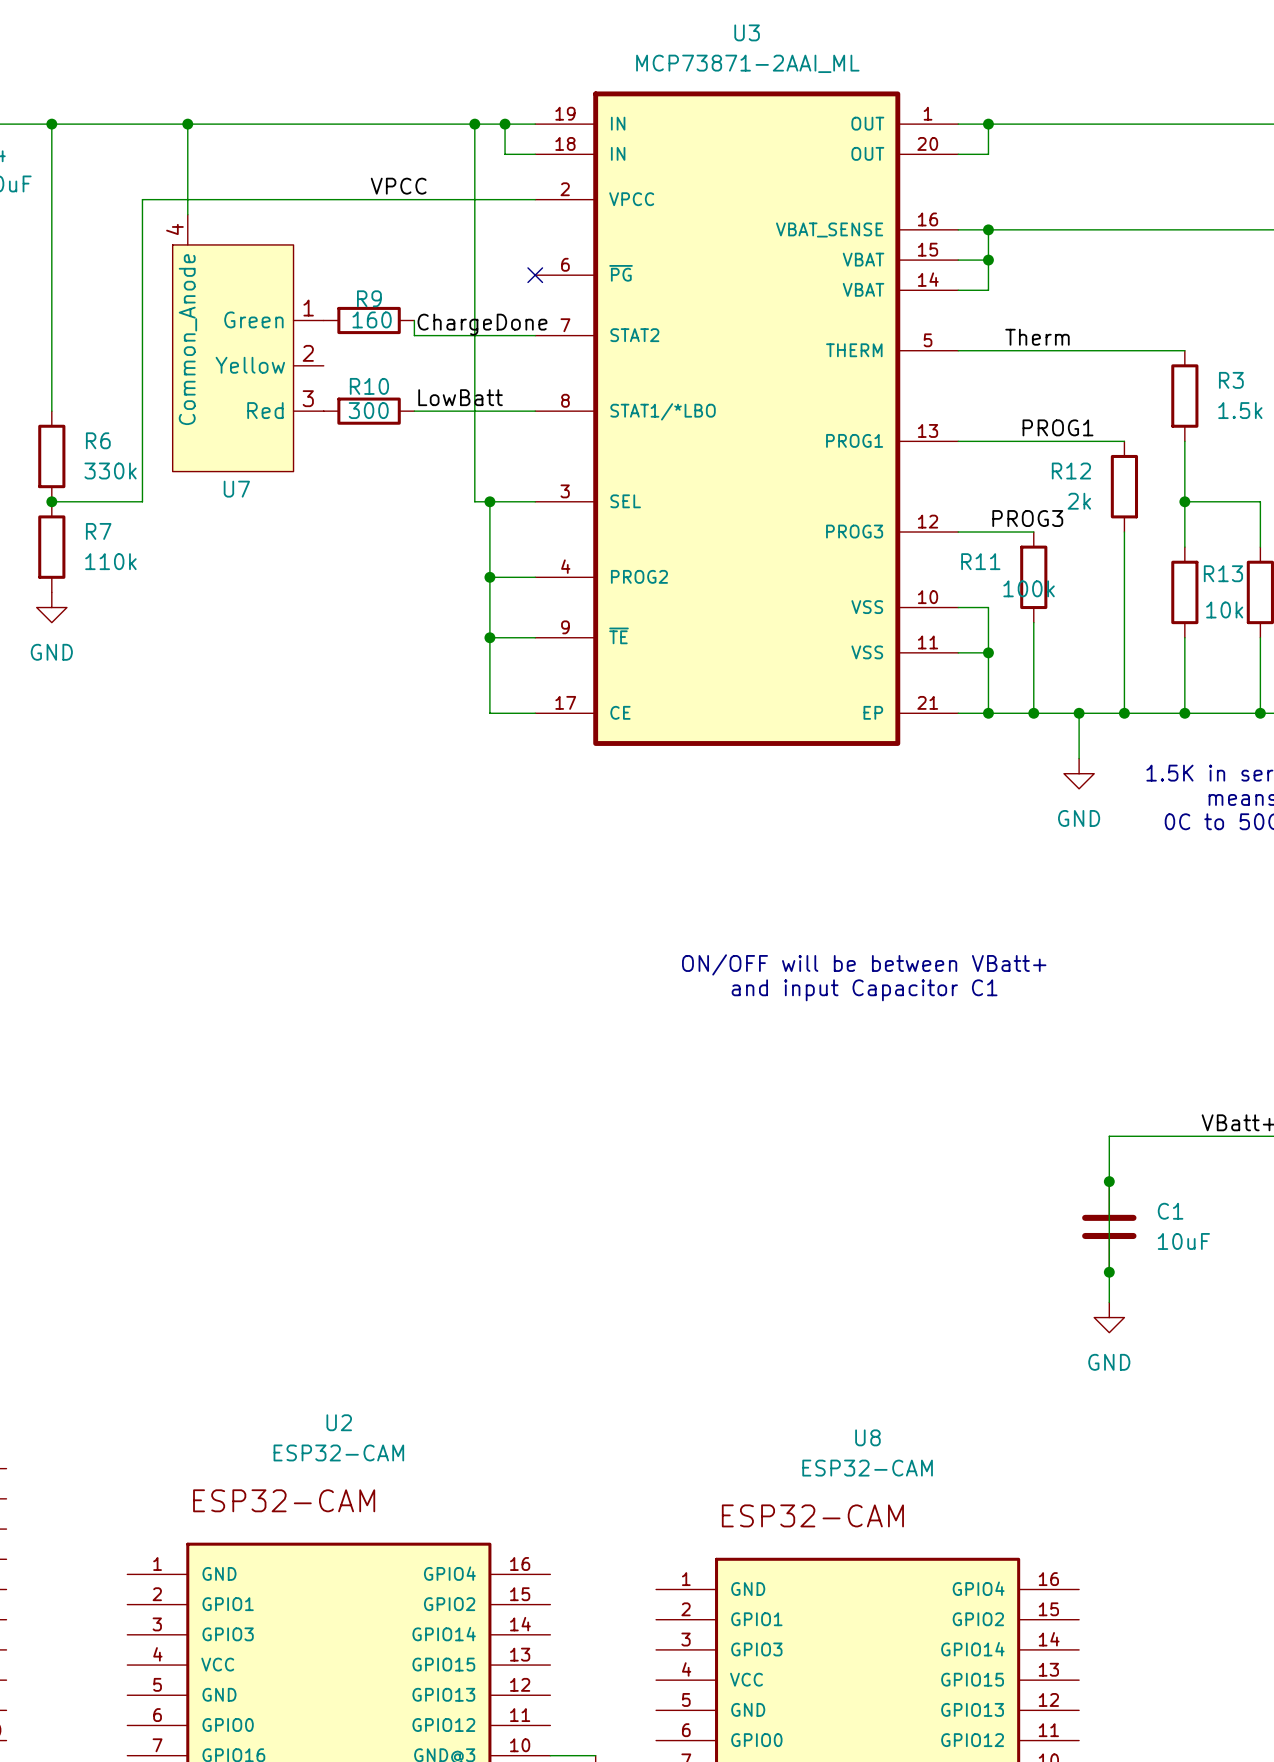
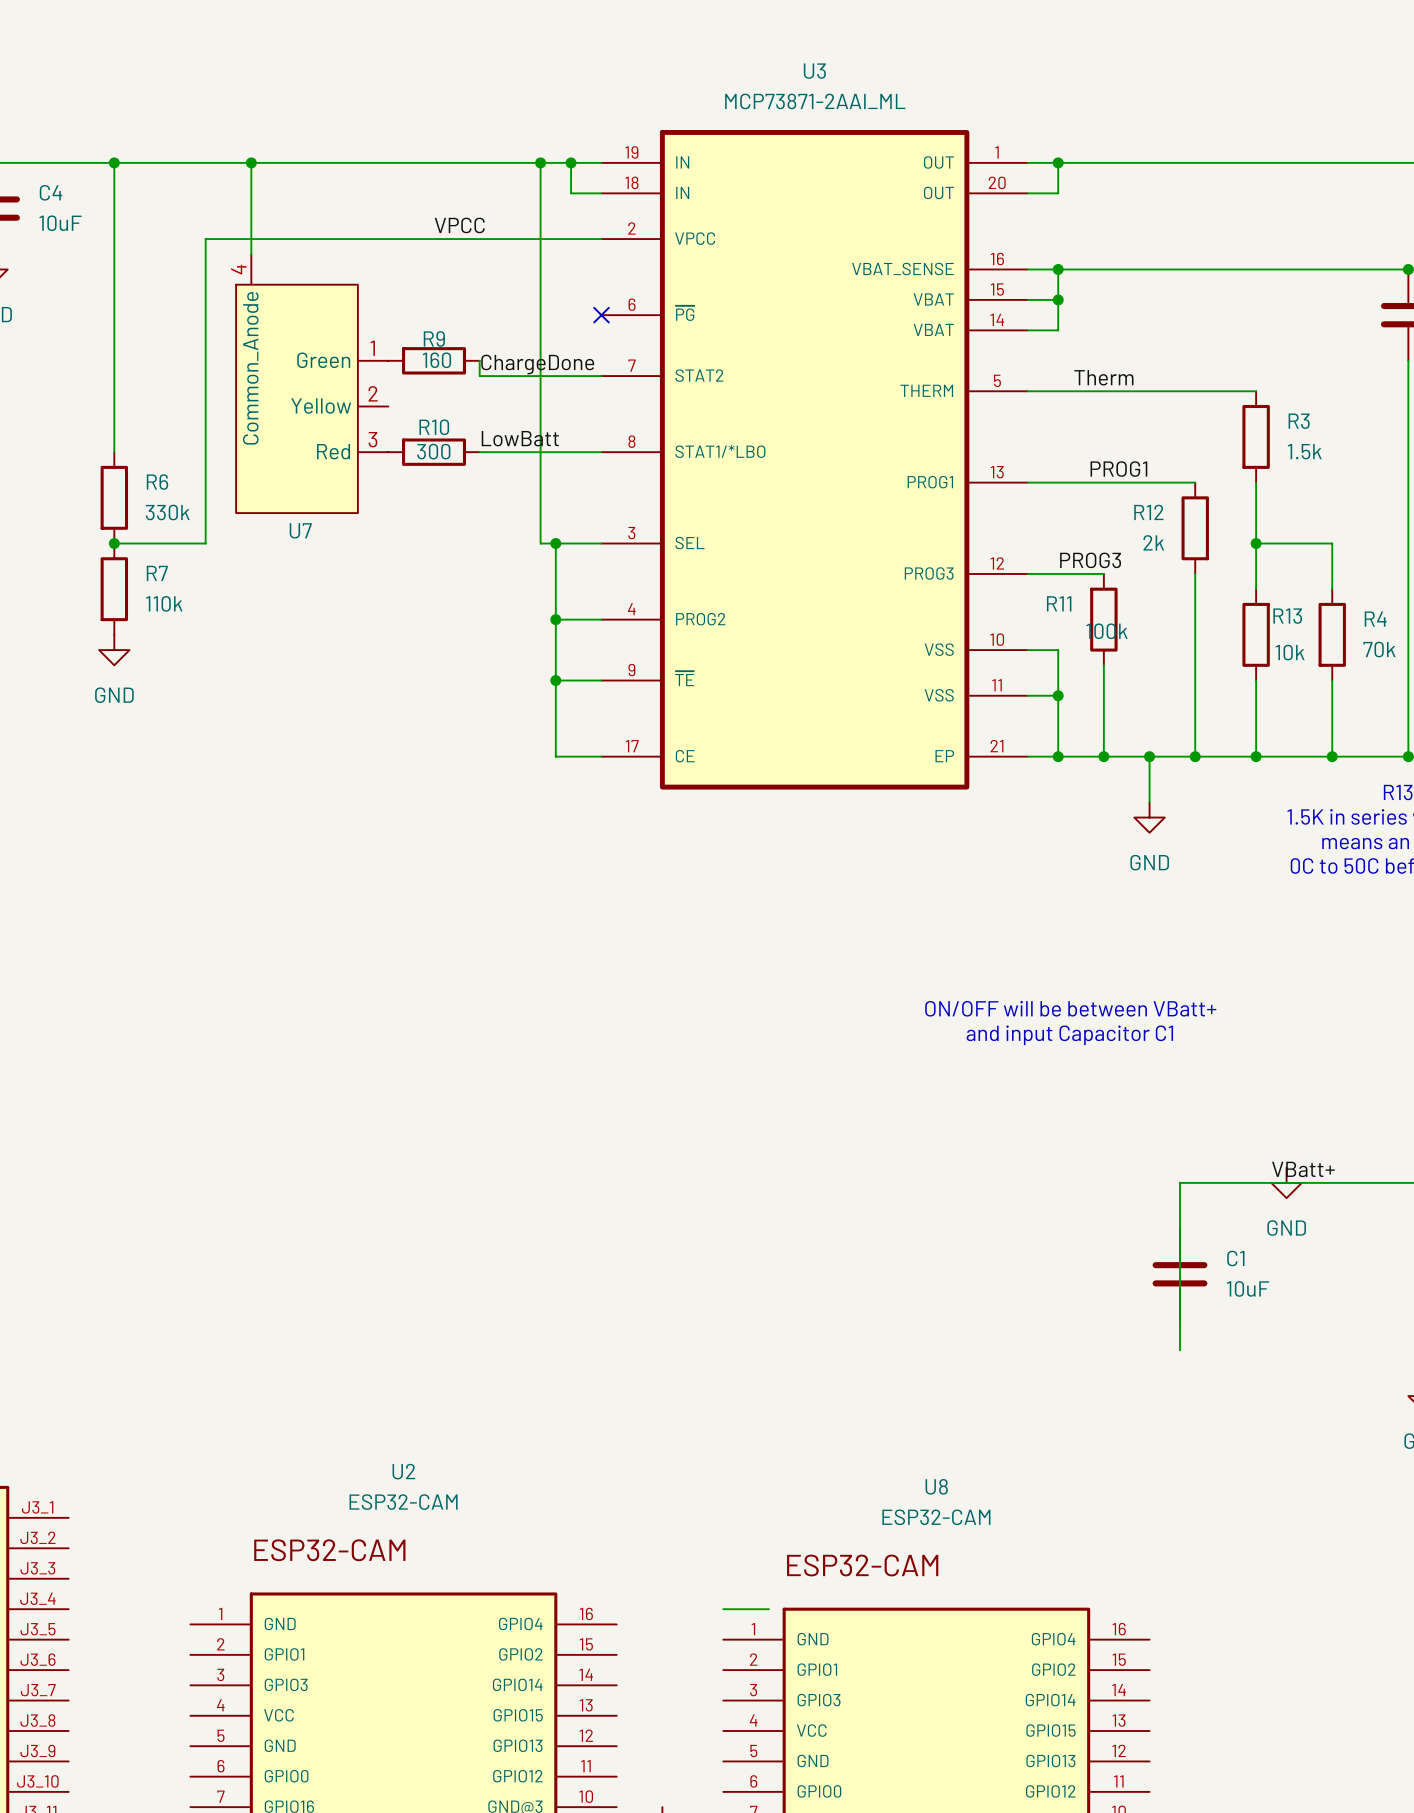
text position: ON/OFF will be between VBatt+ (864, 964) -> ON/OFF will be between VBatt+ (1070, 1008)
text position: and input Capacitor C1 (864, 990) -> and input Capacitor C1 (1069, 1035)
power symbol: none -> GND (1286, 1182)
junction: (1109, 1181) -> none
junction: (1109, 1272) -> none
power symbol: GND (1109, 1317) -> none
wire: (550, 1755) (595, 1755) -> (723, 1609) (768, 1609)

